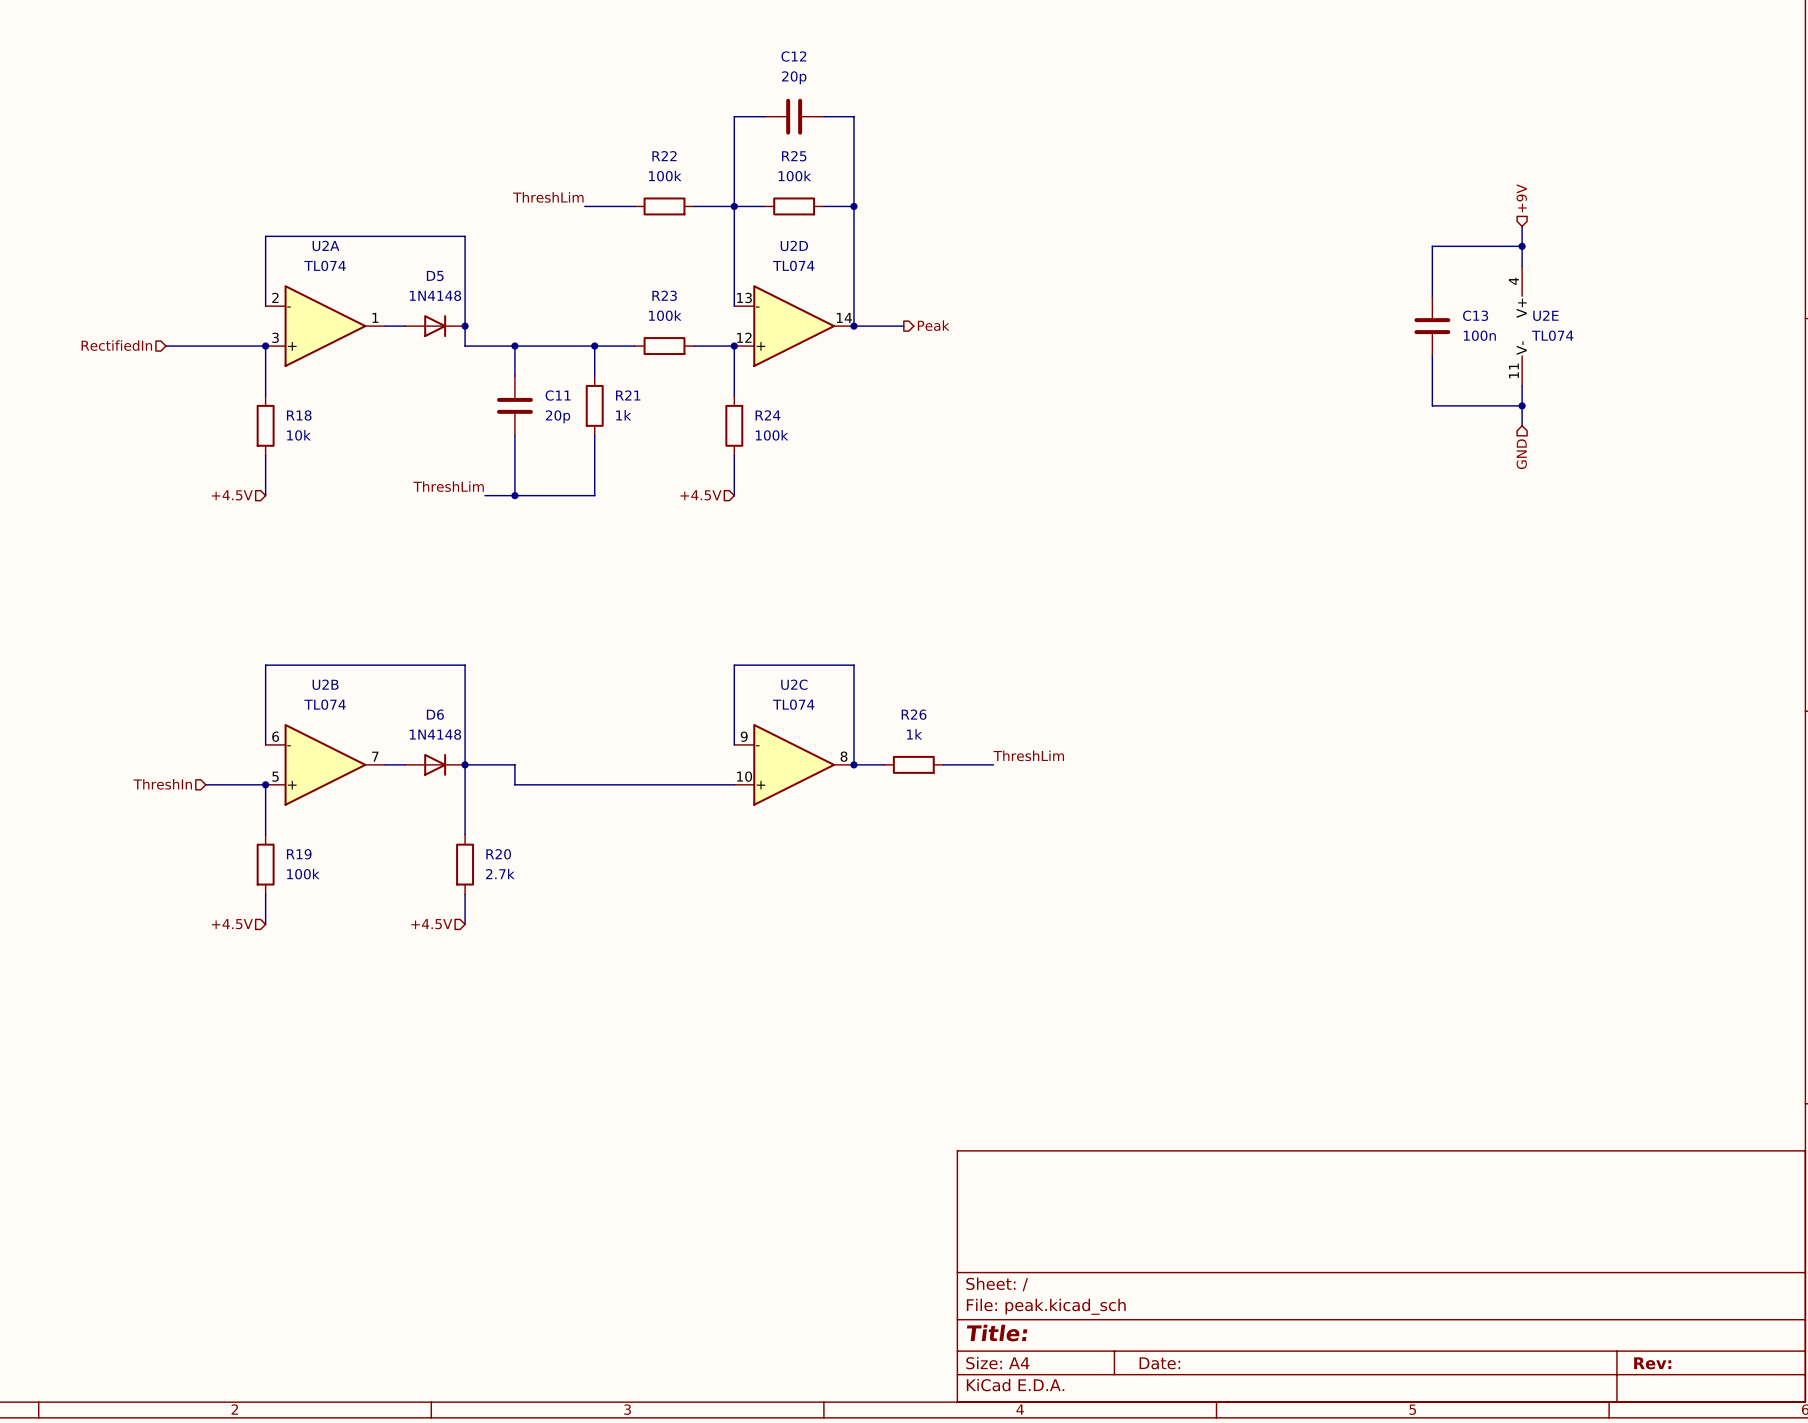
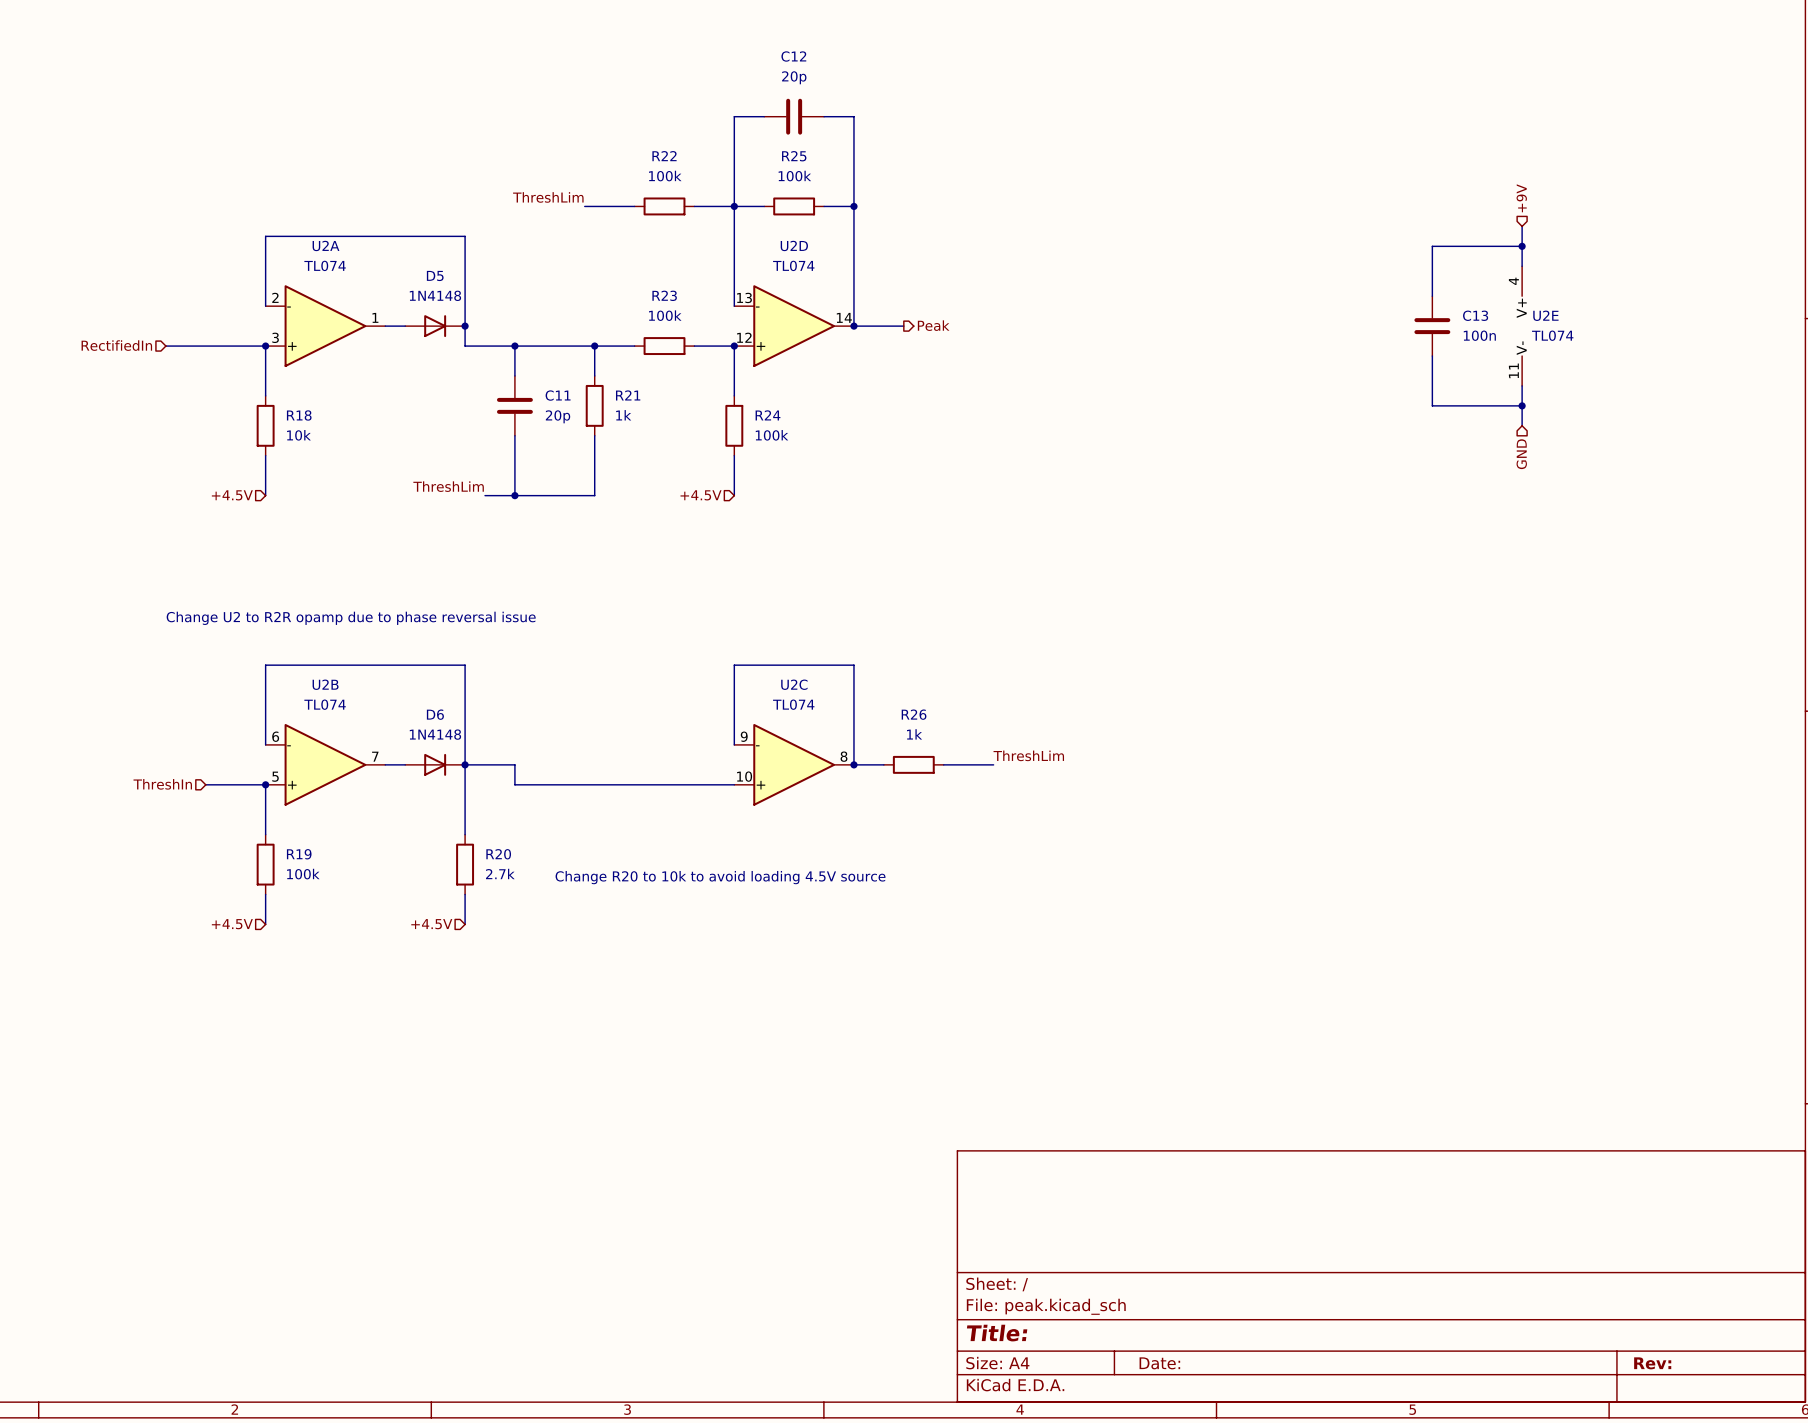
text: none -> Change U2 to R2R opamp due to phase reversal issue (351, 618)
text: none -> Change R20 to 10k to avoid loading 4.5V source (720, 877)

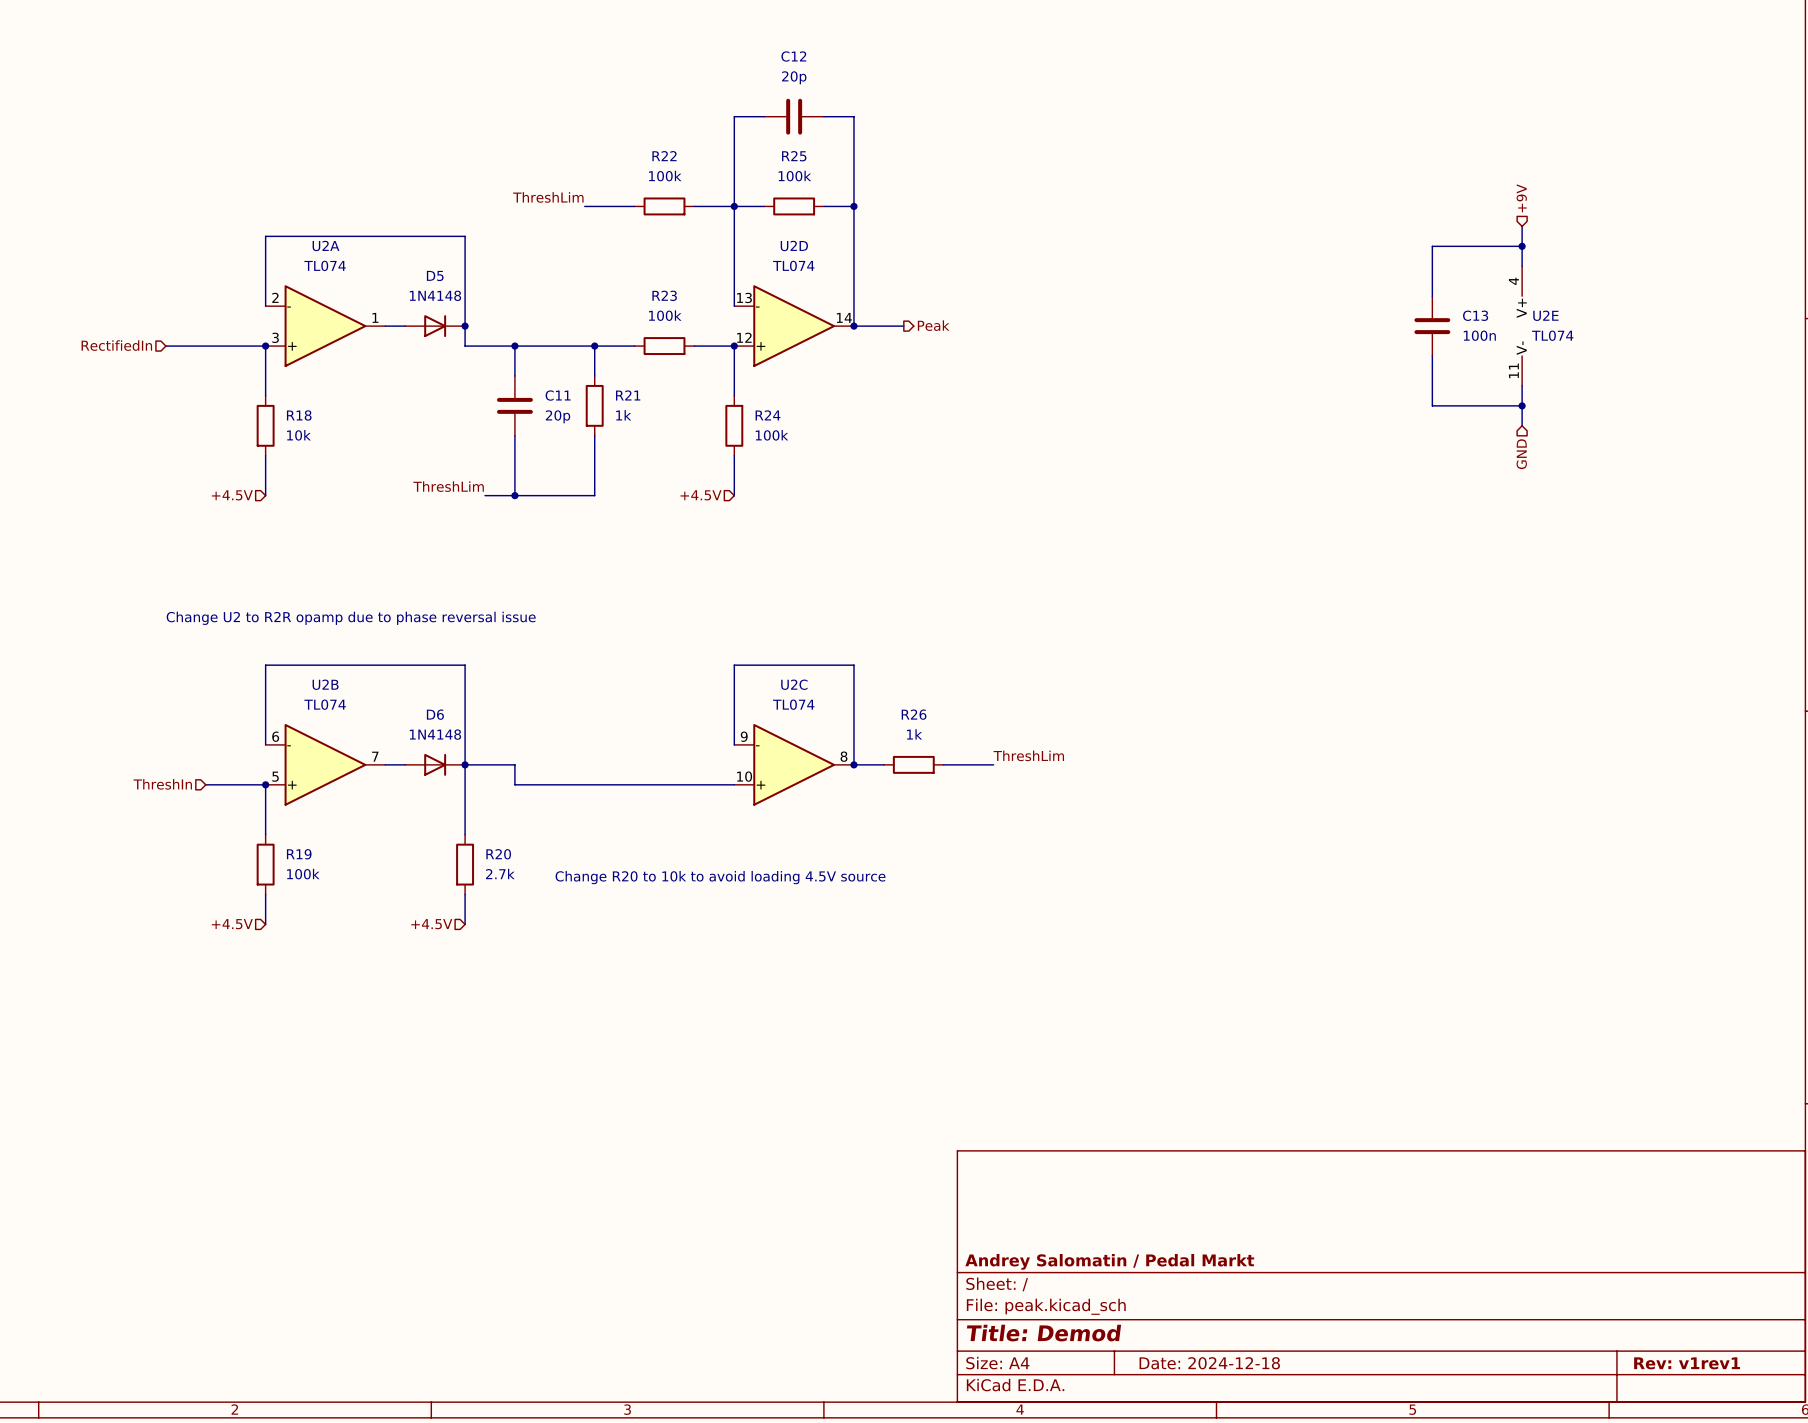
title block: none -> Andrey Salomatin / Pedal Markt (1109, 1261)
title block: Title: (997, 1333) -> Title: Demod (1044, 1333)
title block: Date: (1159, 1363) -> Date: 2024-12-18 (1209, 1363)
title block: Rev: (1652, 1363) -> Rev: v1rev1 (1687, 1363)

